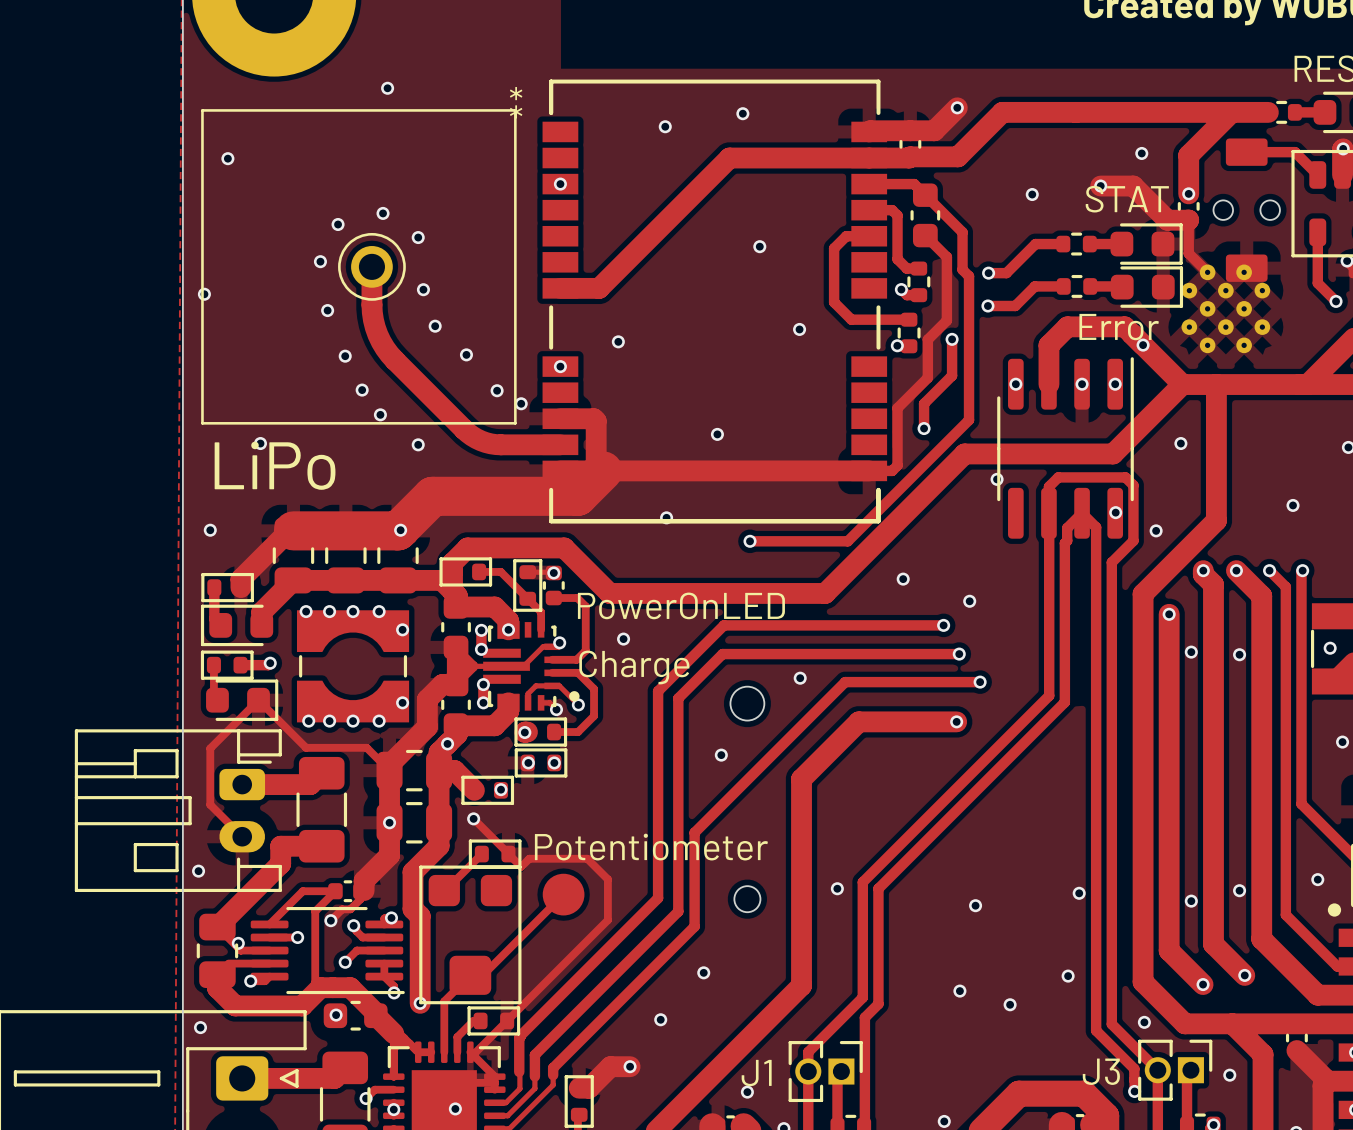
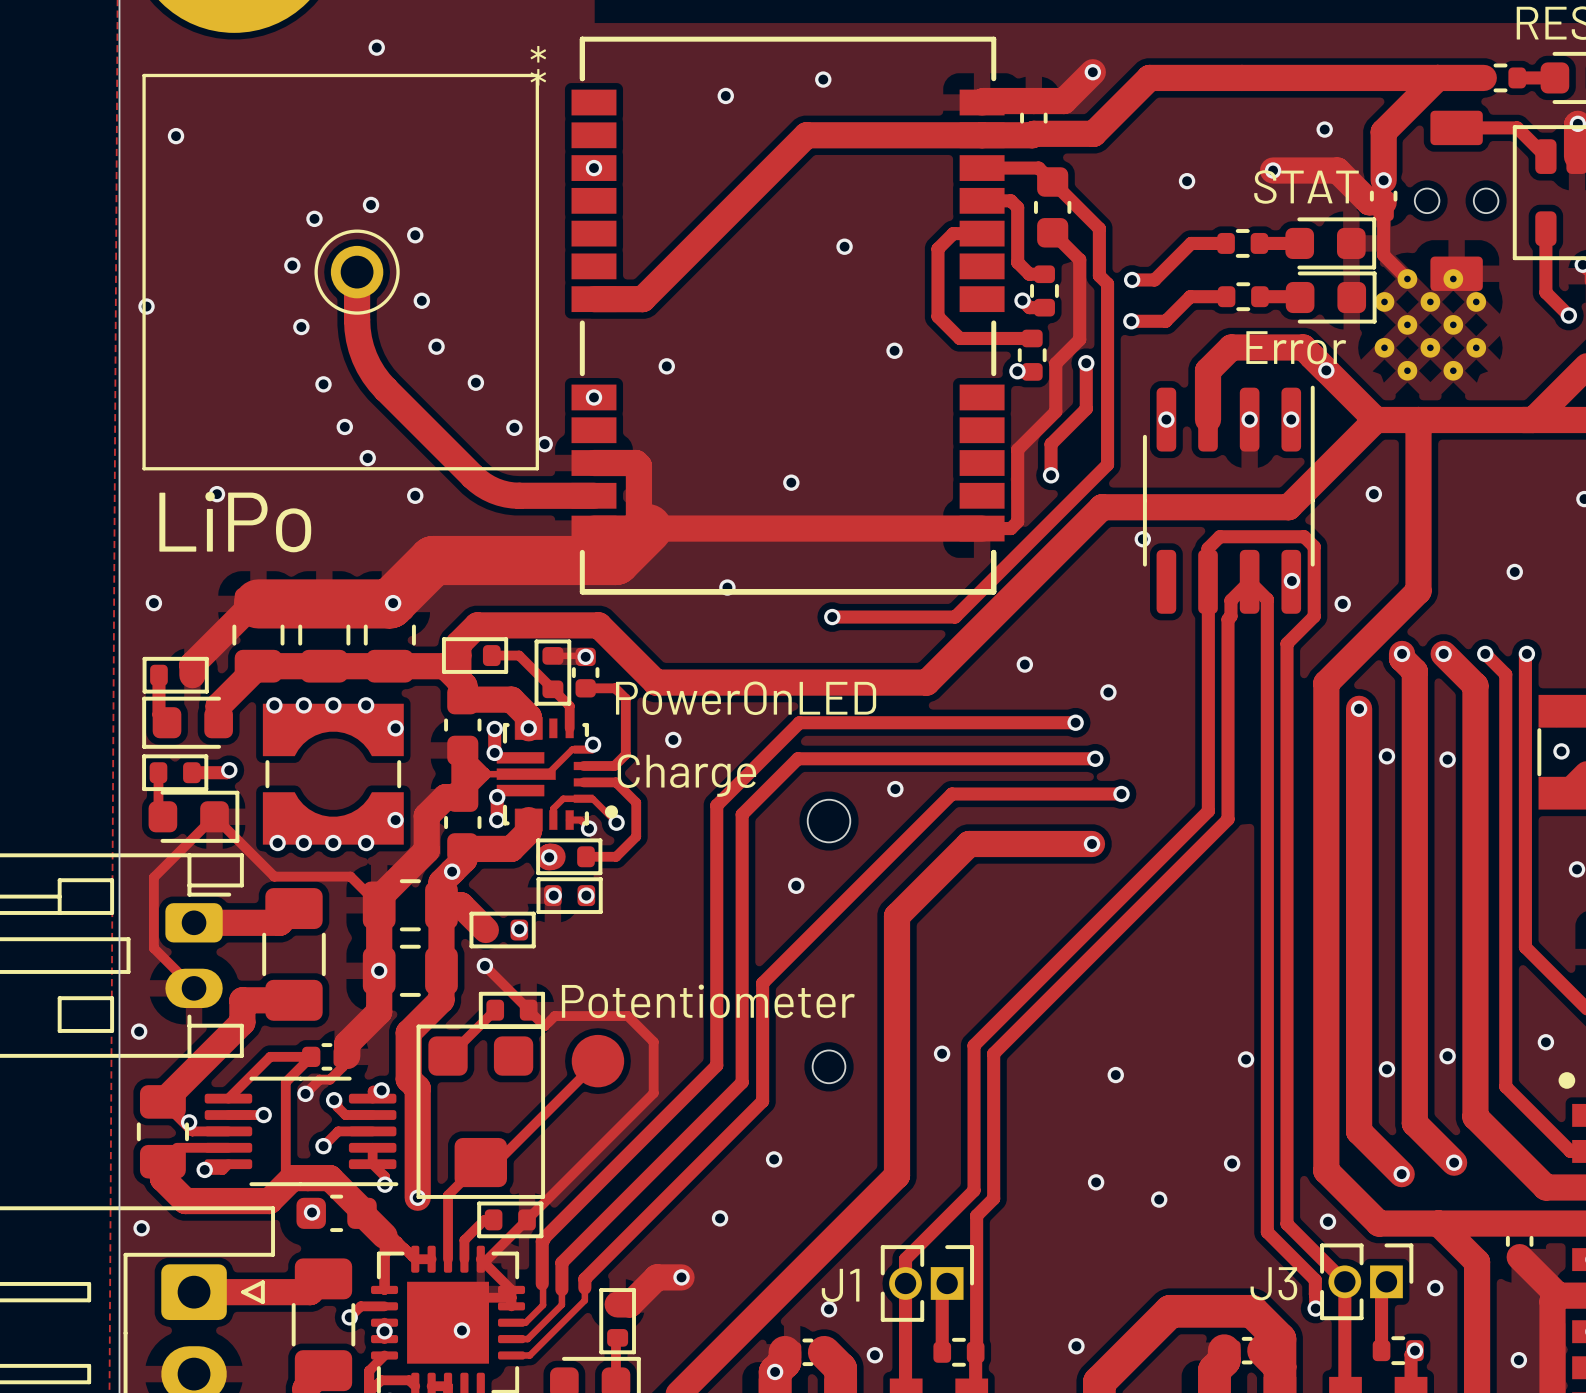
track: (1133, 186) (1167, 220) (1188, 220) -> (1314, 170) (1337, 170) (1369, 202) (1383, 202)

